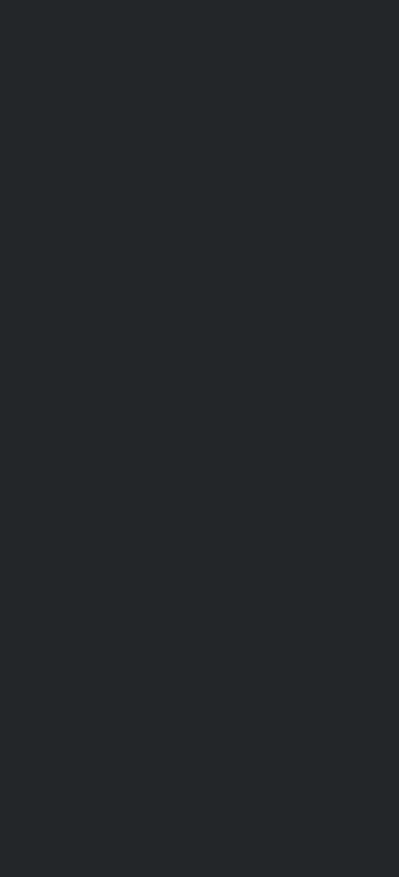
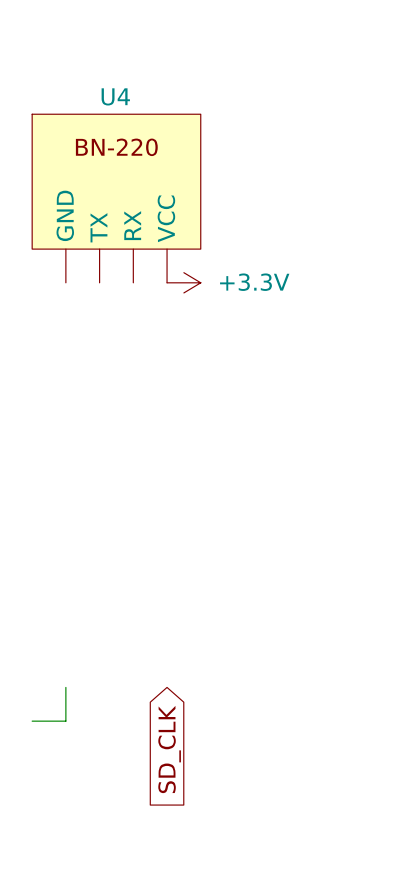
U4: none -> (116, 198)
power symbol: none -> +3.3V (183, 282)
wire: none -> (65, 687) (65, 721) (32, 721)
global label: none -> SD_CLK (169, 749)

